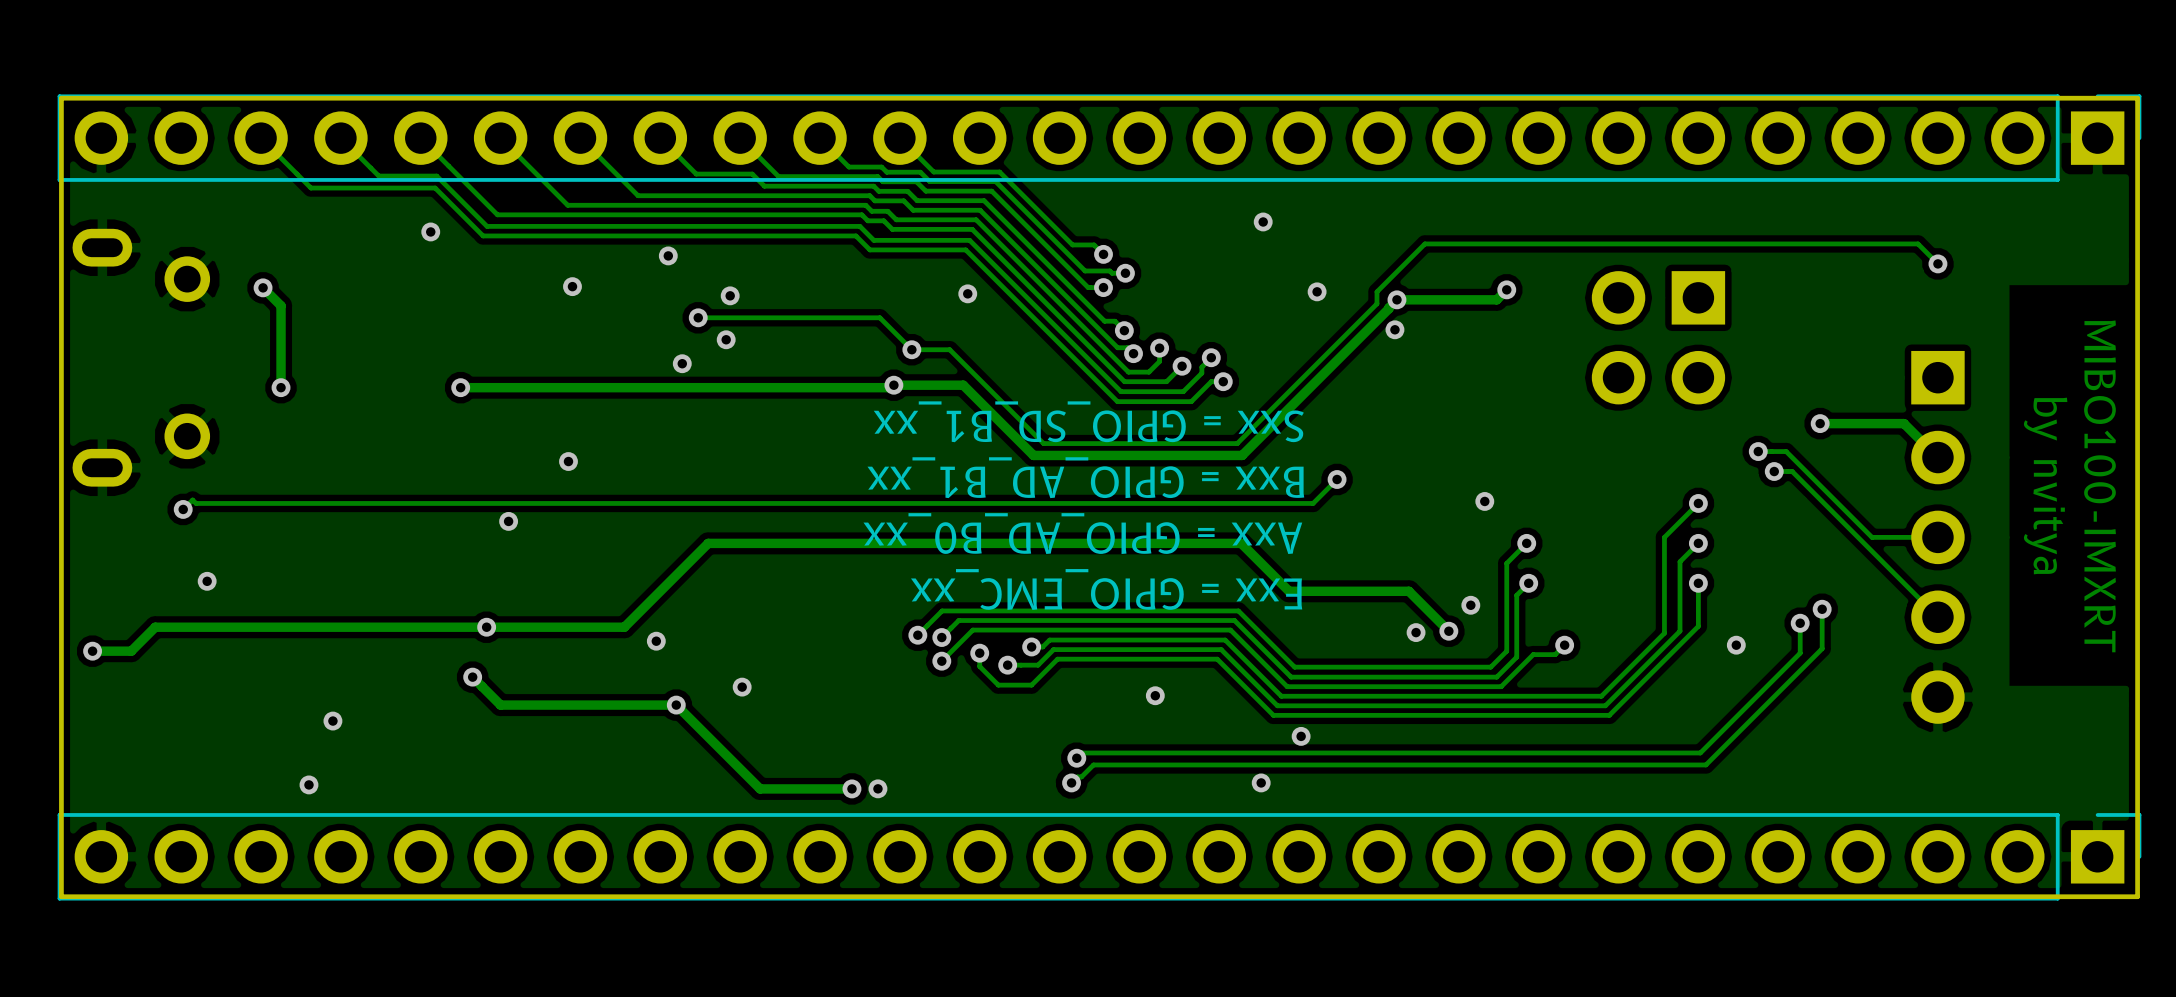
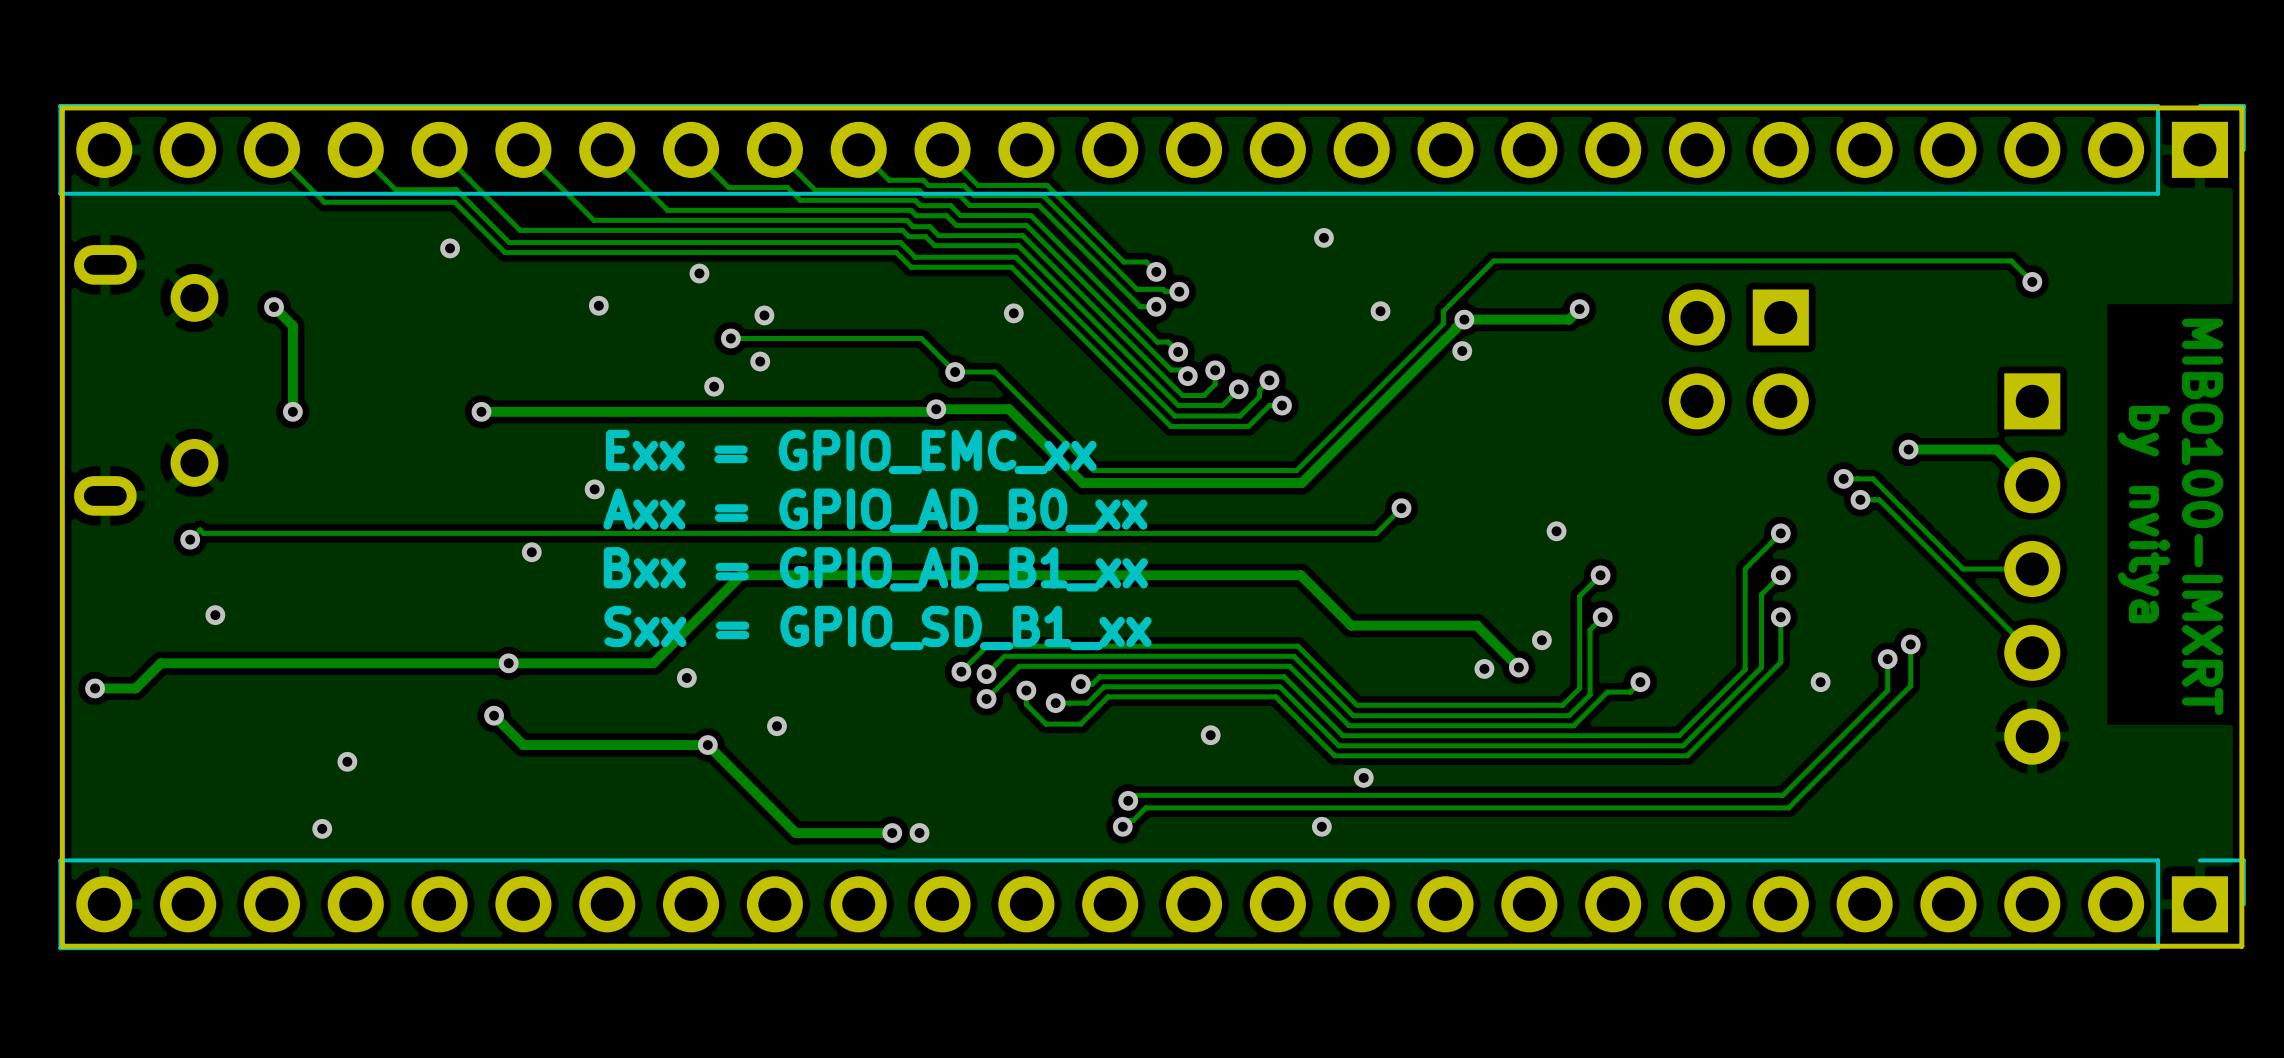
text rotation: 0° (1088, 421) -> 180° (877, 628)
text rotation: 0° (1085, 477) -> 180° (875, 569)
text rotation: 0° (1082, 533) -> 180° (875, 510)
text rotation: 0° (1106, 589) -> 180° (851, 451)

